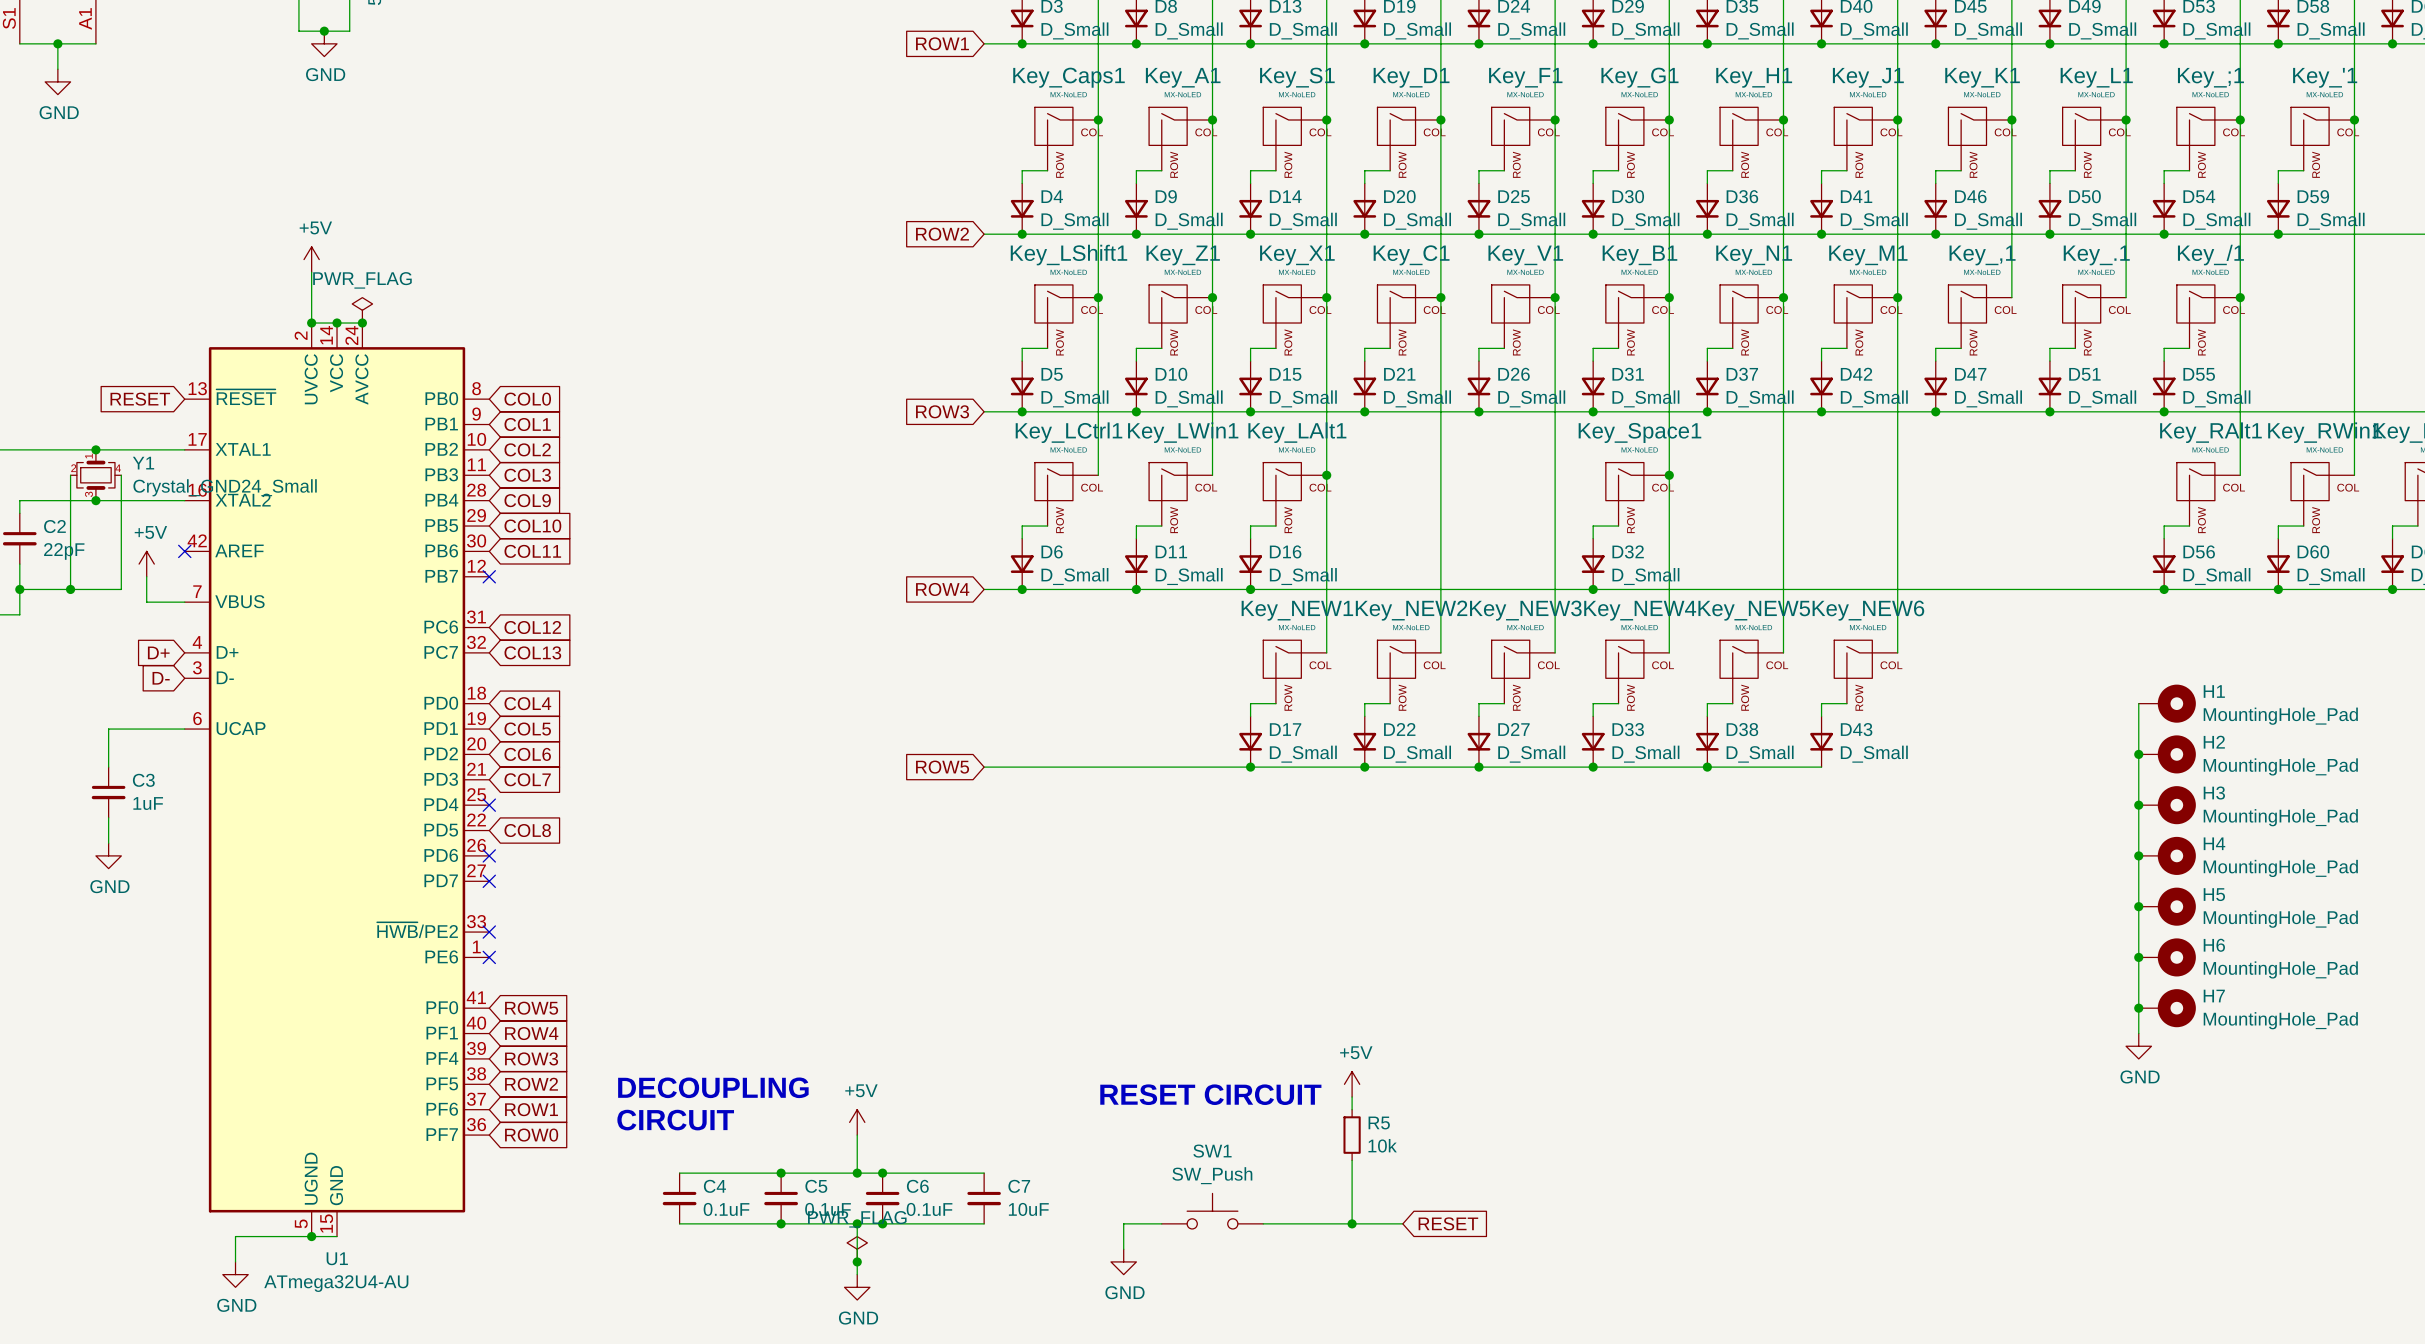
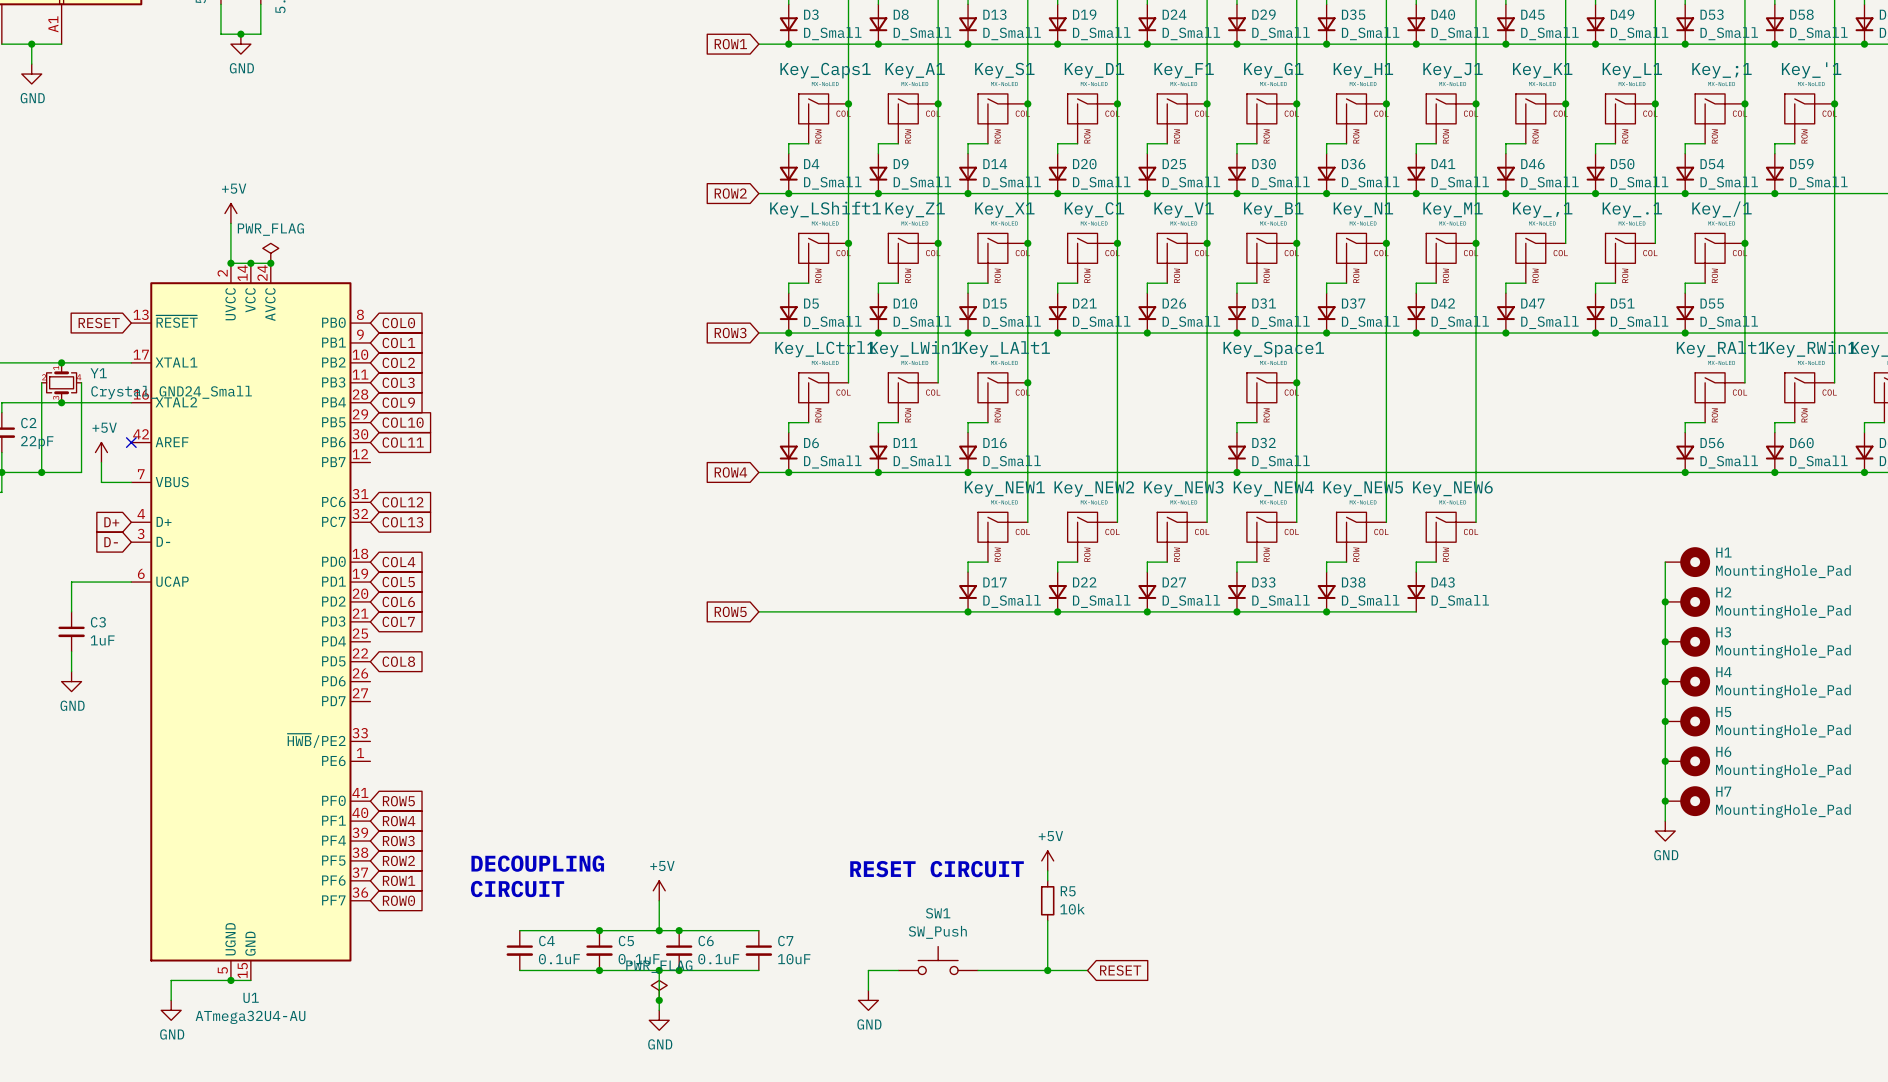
no-connect mark: (489, 576) -> none
no-connect mark: (489, 805) -> none
no-connect mark: (489, 855) -> none
no-connect mark: (489, 881) -> none
no-connect mark: (489, 932) -> none
no-connect mark: (489, 957) -> none

